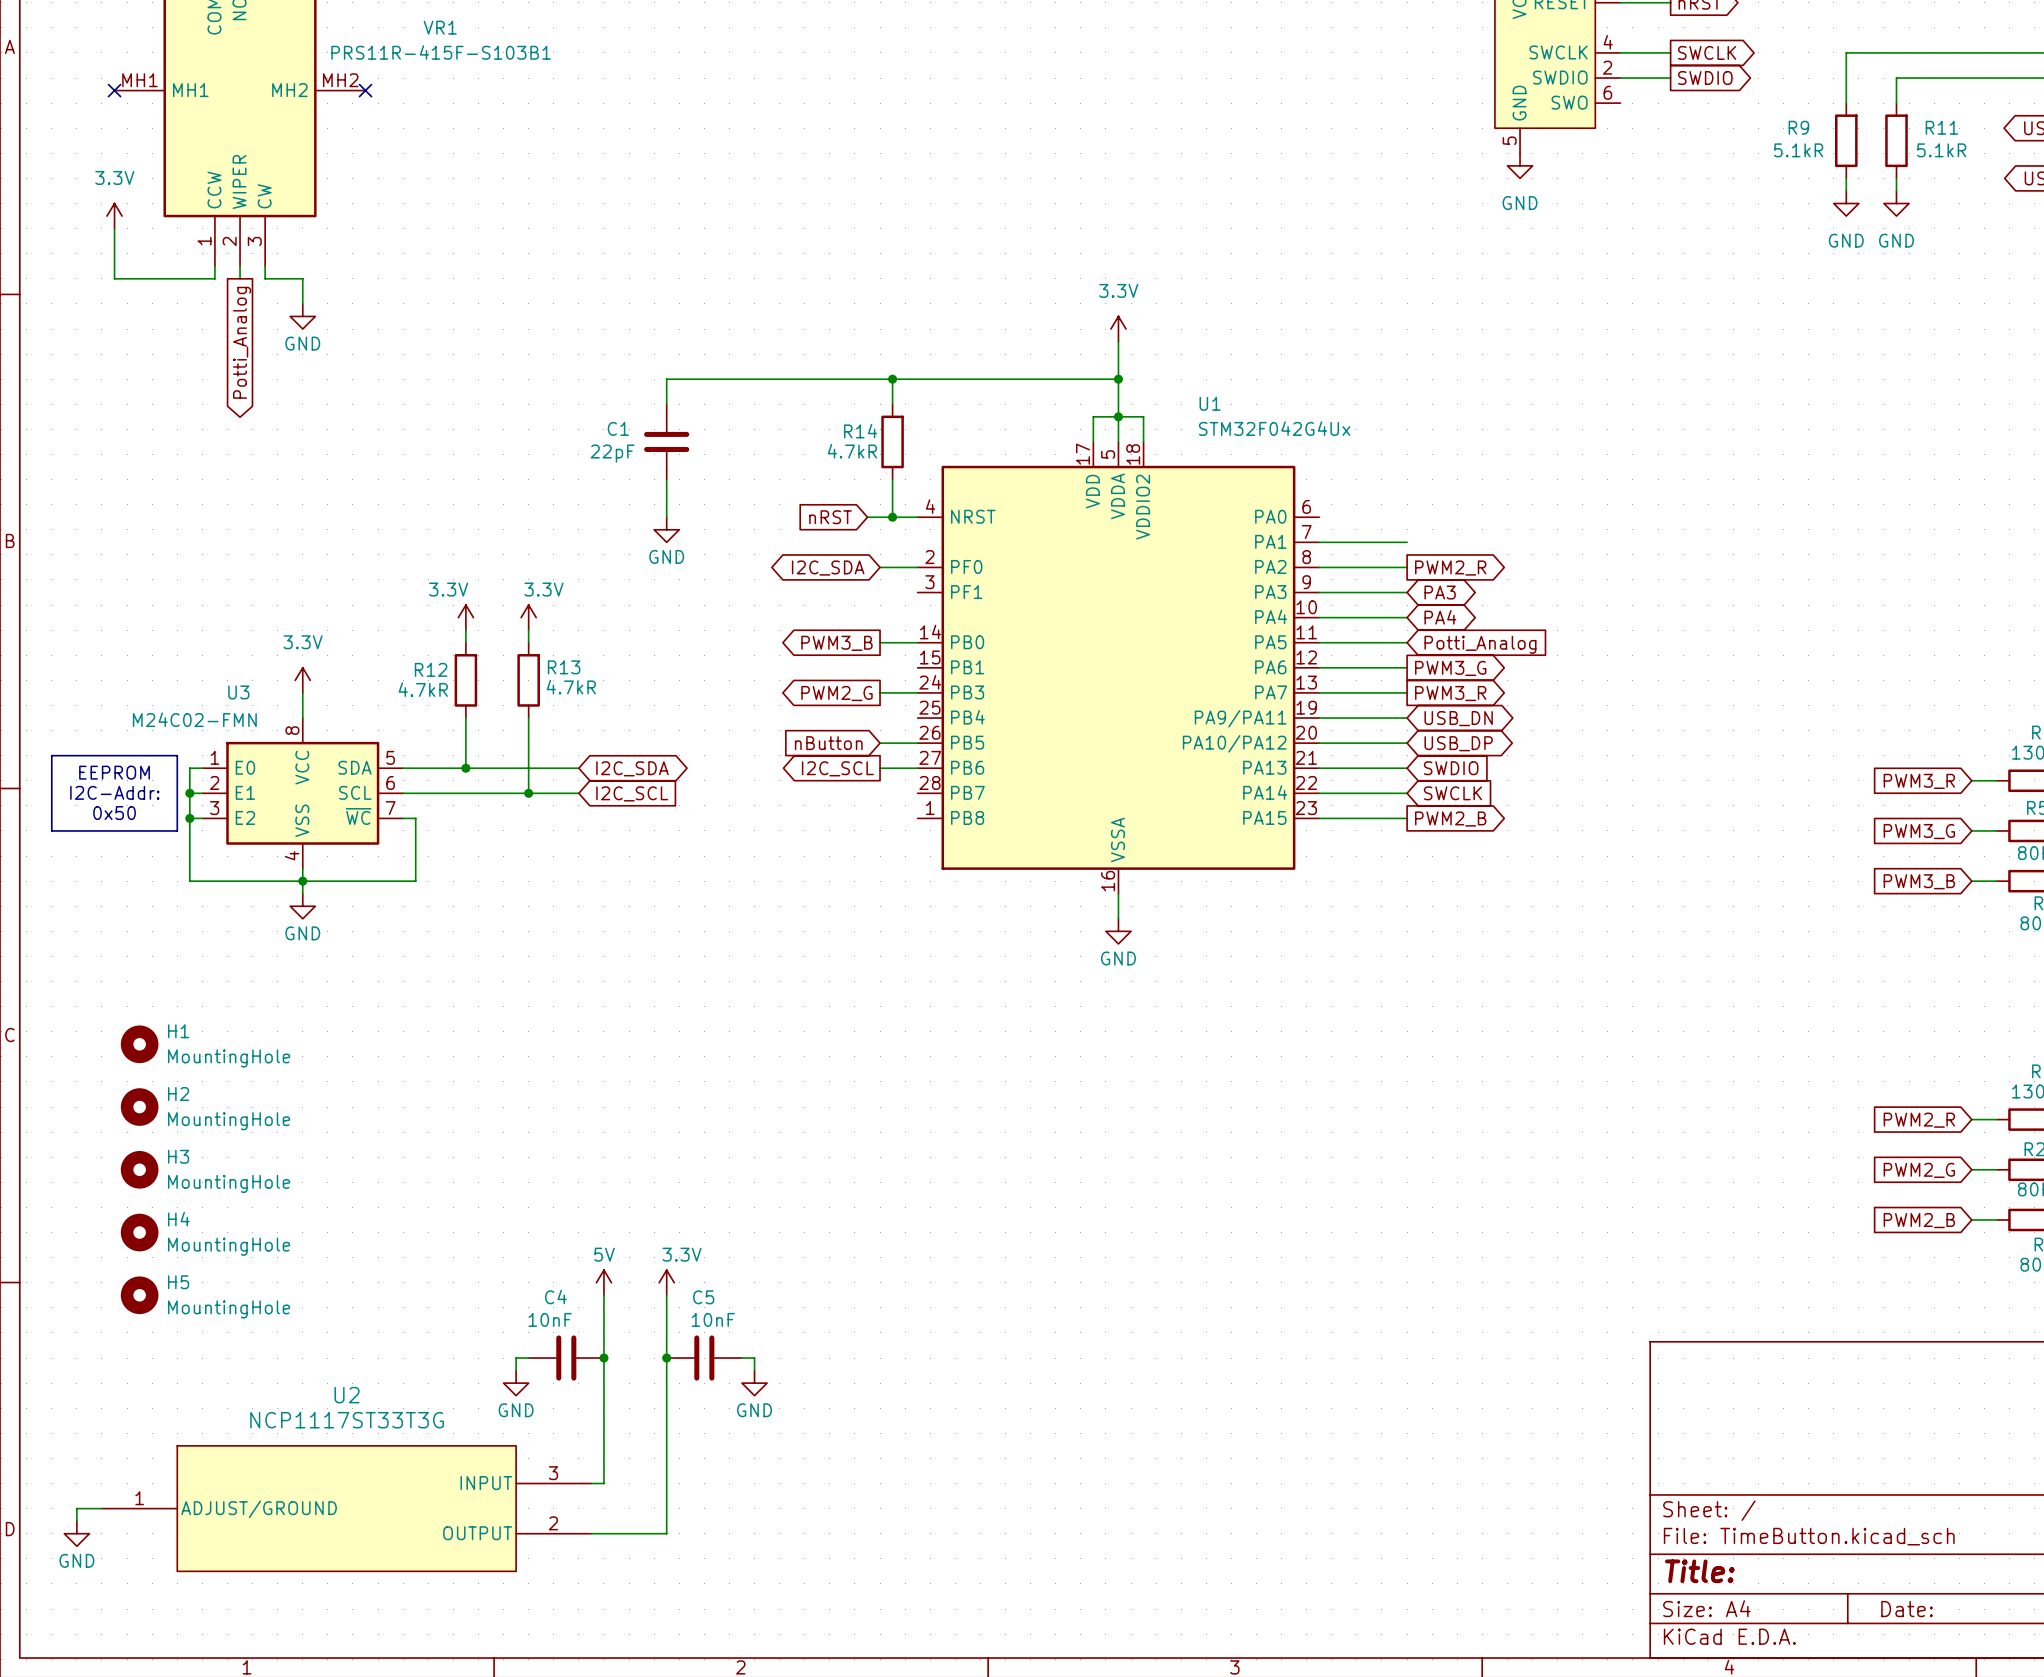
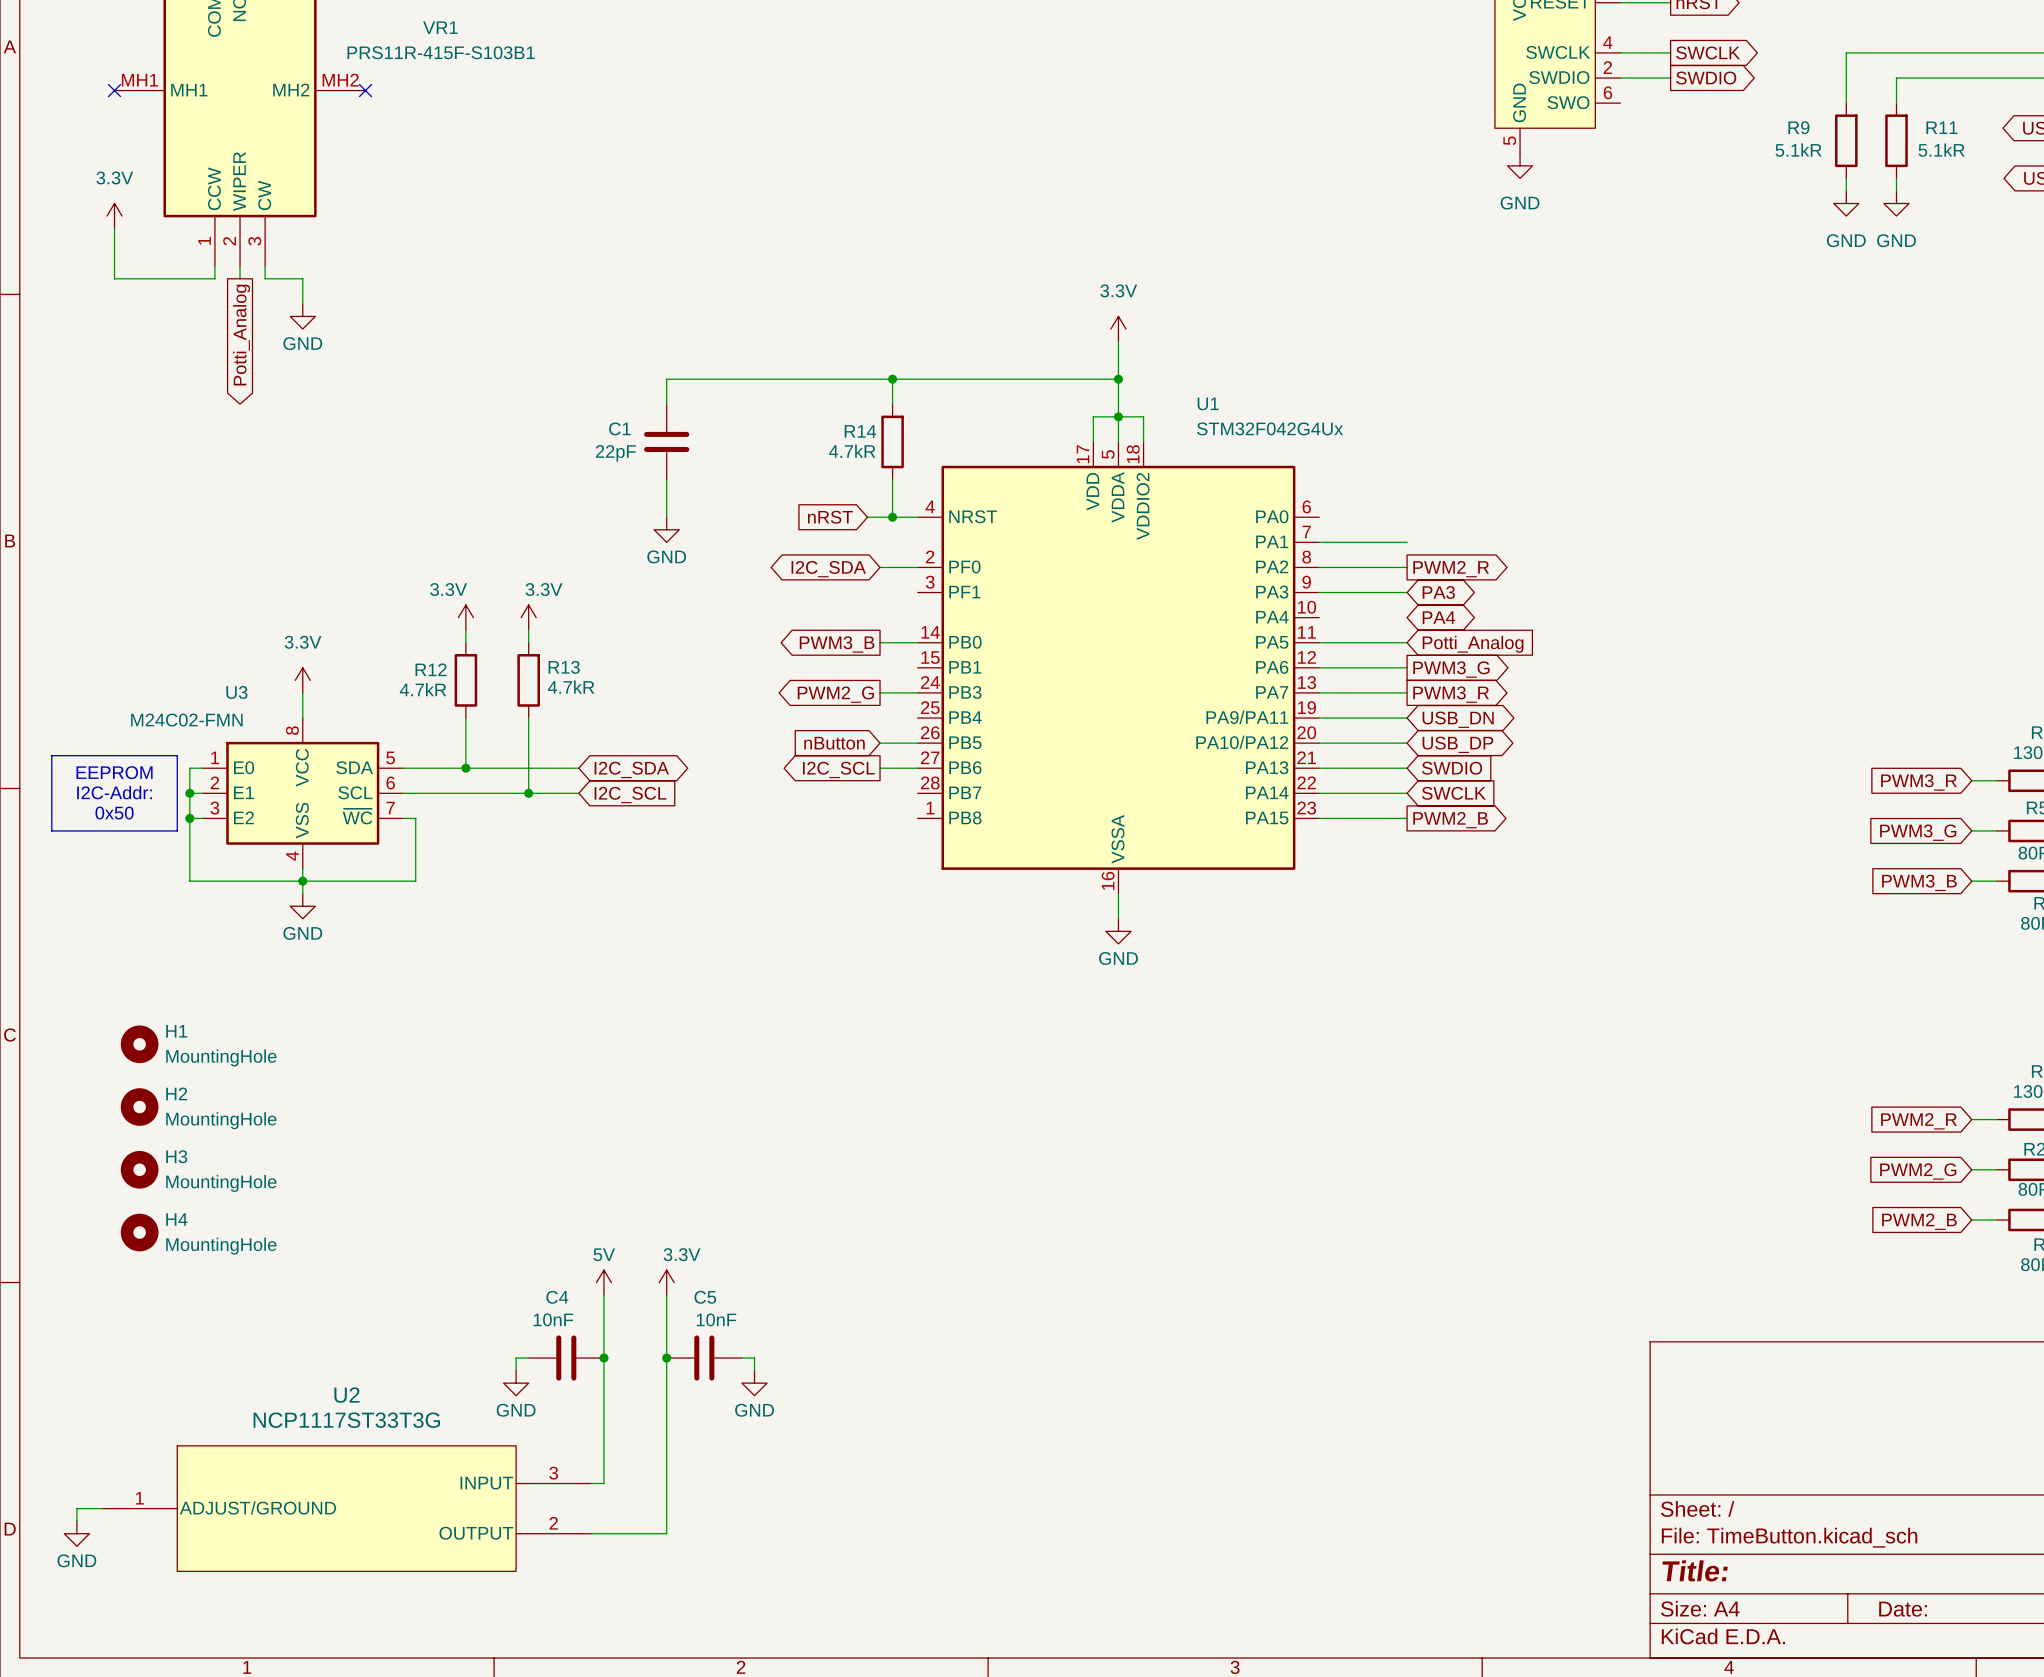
wire: (1319, 617) (1407, 617) -> none
H5: MountingHole (139, 1295) -> none

